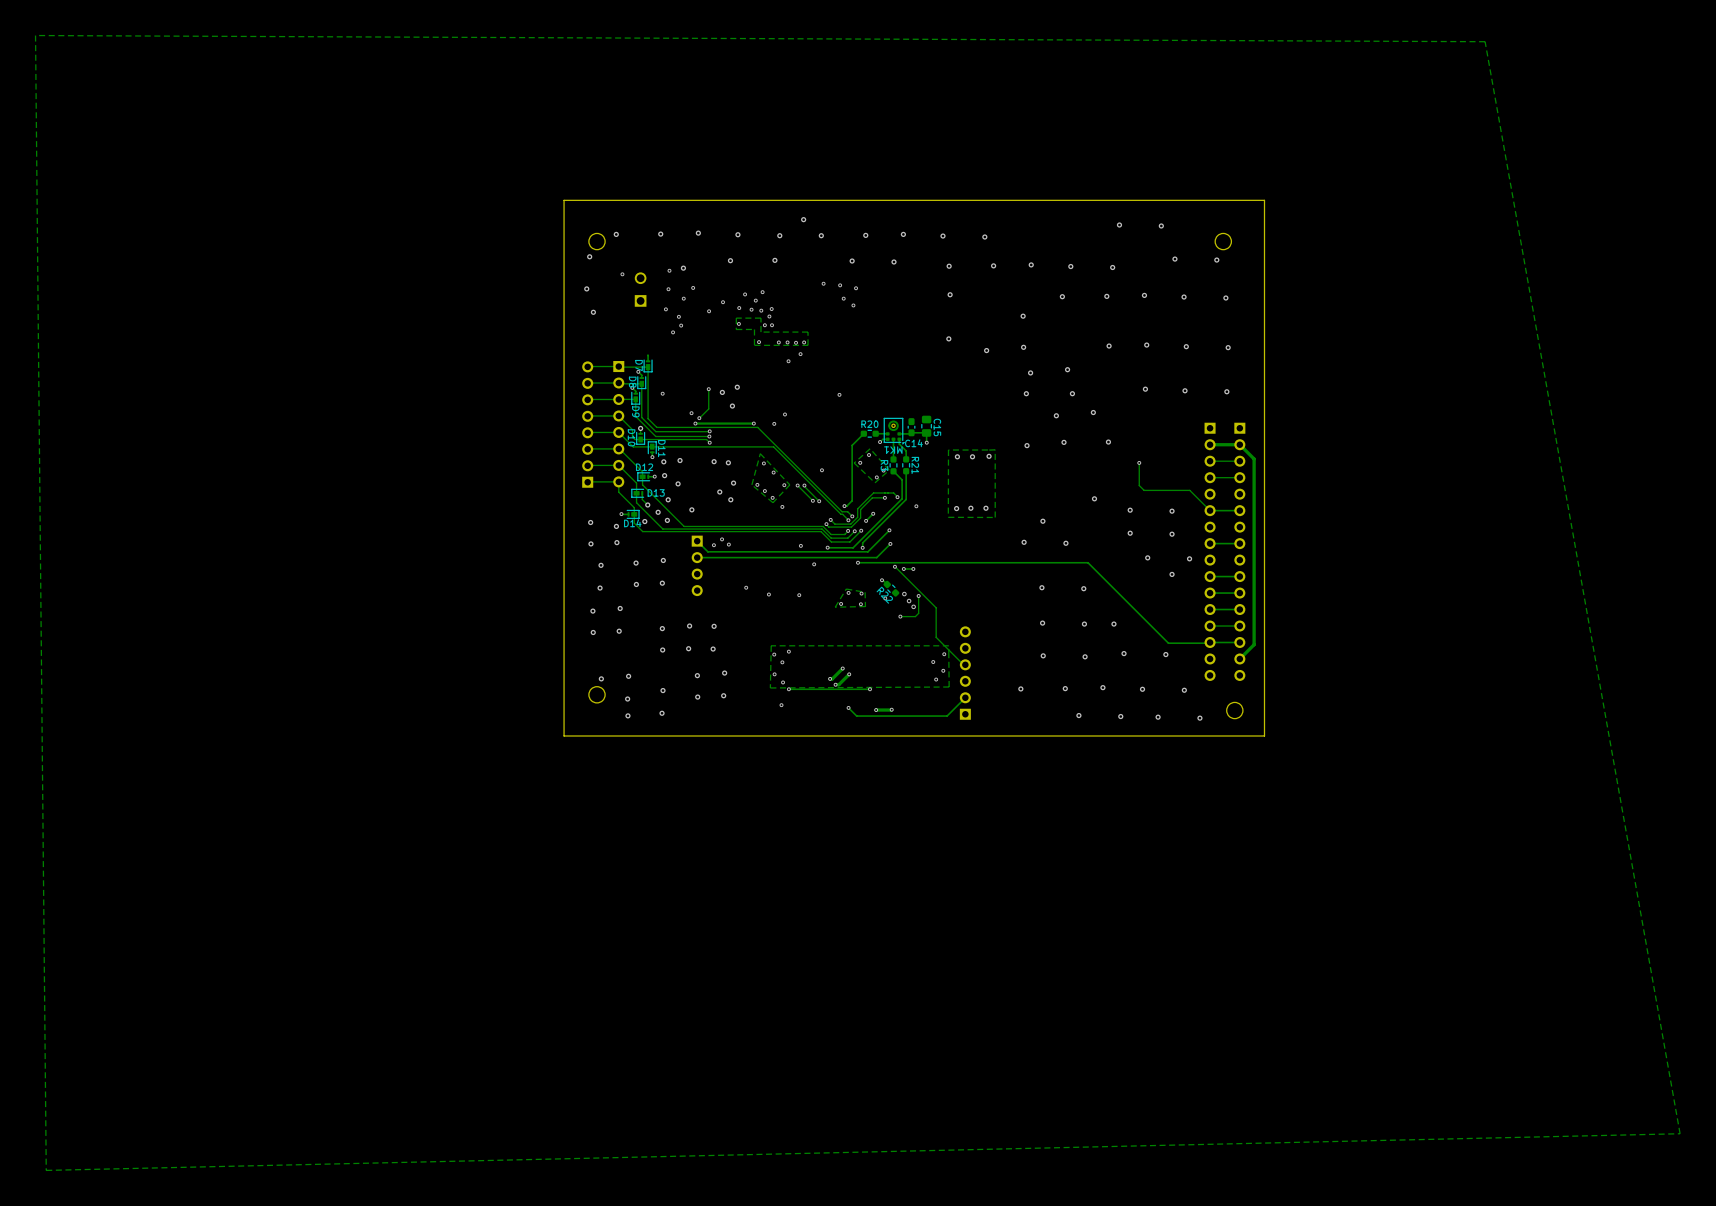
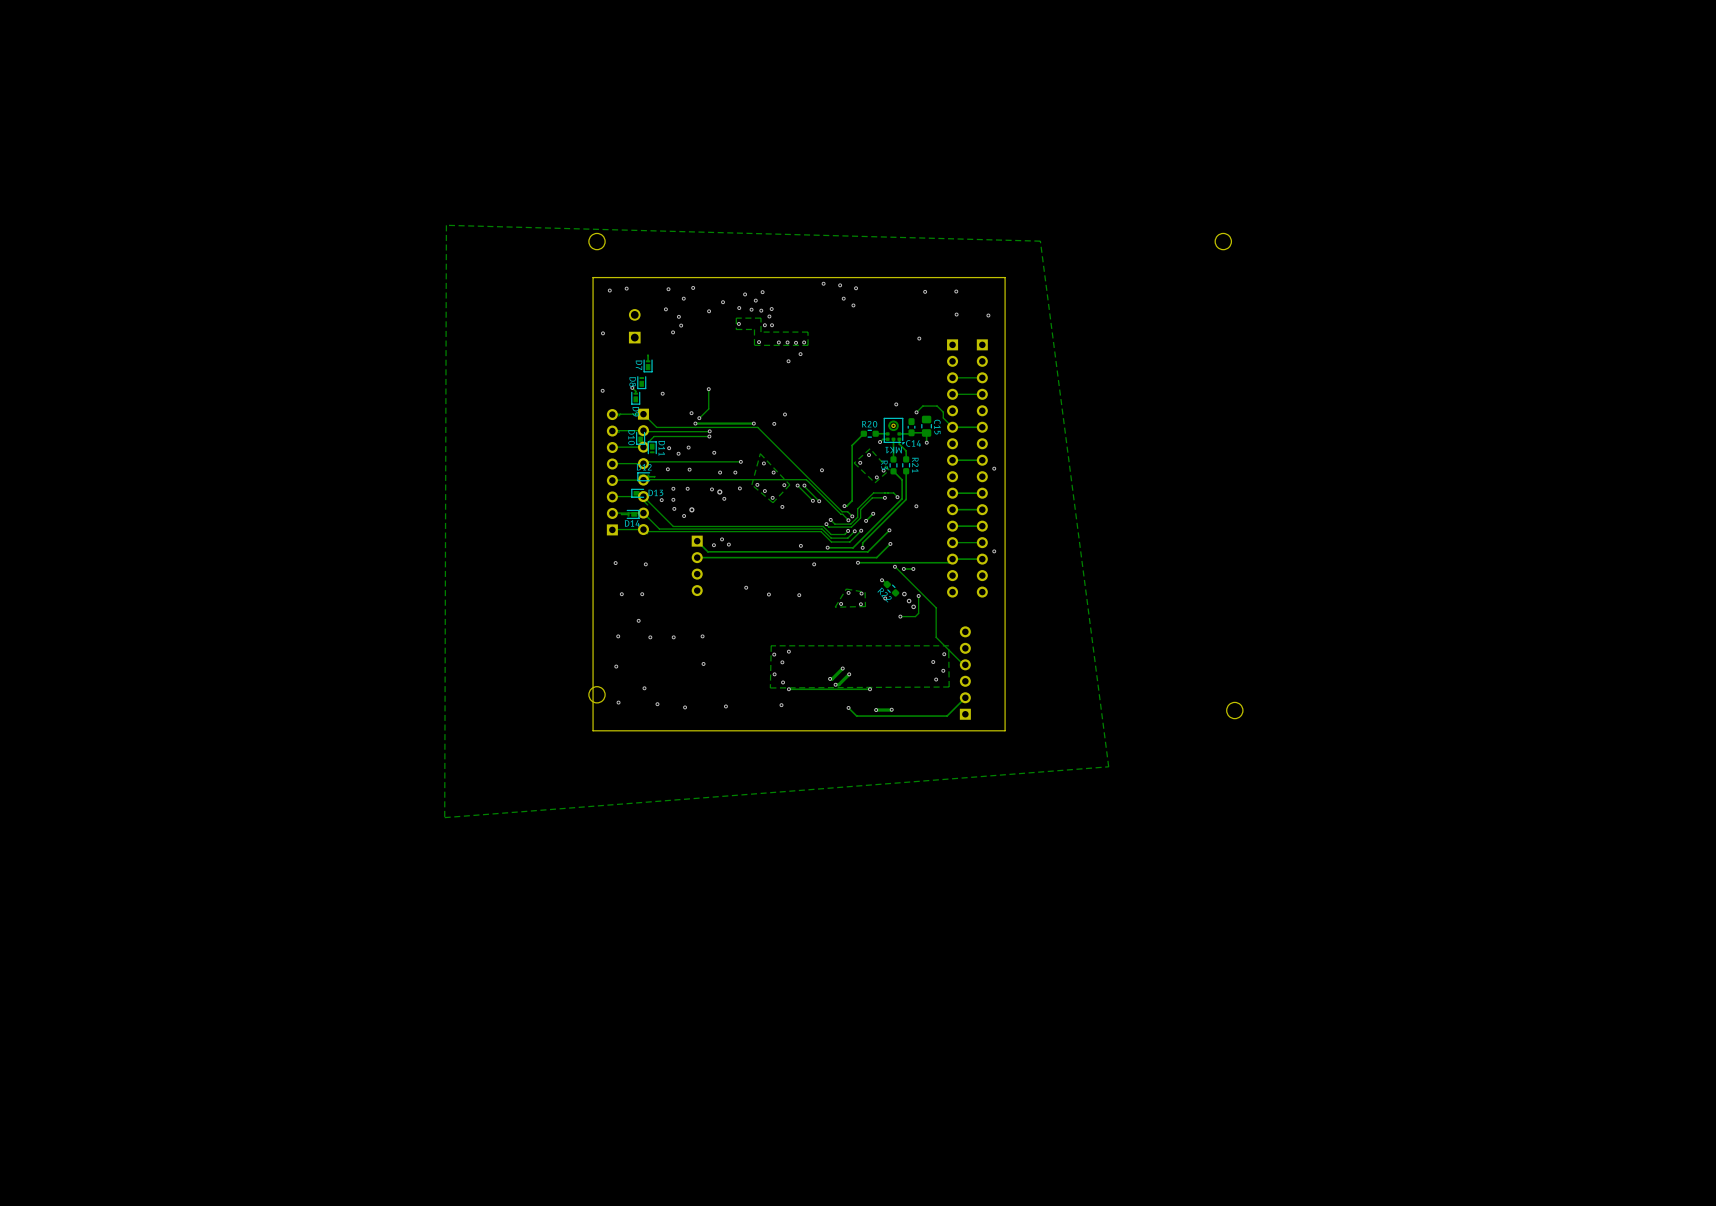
zone outline: (35, 35) (1485, 41) (1680, 1133) (46, 1170) (35, 35) -> none
board edge: (1264, 200) (564, 200) (564, 735) (1264, 735) (1264, 200) -> none
via: (803, 219) -> none
zone outline: none -> (446, 225) (1040, 241) (1108, 766) (444, 817) (446, 225)
via: (1119, 225) -> none
via: (1161, 225) -> none
via: (698, 233) -> none
via: (616, 234) -> none
via: (660, 234) -> none
via: (737, 234) -> none
via: (903, 234) -> none
via: (779, 235) -> none
via: (821, 235) -> none
via: (865, 235) -> none
via: (942, 236) -> none
via: (984, 237) -> none
via: (589, 256) -> none
via: (1174, 259) -> none
via: (730, 260) -> none
via: (774, 260) -> none
via: (1216, 260) -> none
via: (852, 261) -> none
via: (893, 261) -> none
via: (1031, 264) -> none
via: (993, 265) -> none
via: (949, 266) -> none
via: (1070, 266) -> none
via: (1112, 267) -> none
via: (683, 268) -> none
via: (669, 270) -> none
via: (622, 274) -> none
board edge: none -> (1005, 277) (593, 277) (593, 730) (1005, 730) (1005, 277)
via: (586, 288) -> none
via: none -> (626, 288)
part position: (640, 289) -> (634, 326)
via: none -> (609, 290)
via: none -> (925, 291)
via: none -> (956, 291)
via: (950, 294) -> none
via: (1144, 295) -> none
via: (1062, 296) -> none
via: (1106, 296) -> none
via: (1184, 297) -> none
via: (1225, 298) -> none
via: (593, 312) -> none
via: none -> (956, 314)
via: none -> (988, 315)
via: (1023, 316) -> none
via: none -> (602, 333)
via: none -> (919, 338)
via: (948, 338) -> none
via: (1146, 345) -> none
via: (1109, 346) -> none
via: (1186, 346) -> none
via: (1023, 347) -> none
via: (1228, 347) -> none
via: (986, 350) -> none
track: (587, 366) (648, 367) (648, 418) (656, 427) -> (612, 414) (643, 414) (656, 427)
via: (1067, 369) -> none
track: (638, 371) (641, 378) -> none
via: (638, 371) -> none
via: (1030, 372) -> none
track: none -> (982, 377) (952, 377)
track: (587, 383) (641, 383) (641, 417) (655, 431) -> (612, 431) (655, 431)
via: (737, 387) -> none
via: (1145, 389) -> none
via: none -> (602, 390)
via: (1185, 390) -> none
via: (1226, 391) -> none
via: (722, 392) -> none
track: none -> (953, 393) (982, 394)
via: (1026, 393) -> none
via: (1072, 393) -> none
via: (839, 394) -> none
track: (587, 399) (635, 399) (635, 416) (655, 436) -> (612, 447) (643, 447) (655, 436)
via: none -> (896, 404)
via: (732, 406) -> none
track: none -> (916, 412) (922, 406) (937, 406) (943, 412) (943, 418) (952, 427)
via: none -> (916, 412)
via: (1093, 412) -> none
via: (1056, 415) -> none
track: (587, 416) (618, 415) (632, 429) (632, 437) (634, 439) (706, 439) (709, 442) -> none
part: (587, 424) -> none
part: (618, 424) -> none
track: none -> (982, 427) (952, 427)
via: (640, 428) -> none
track: (587, 432) (618, 432) (633, 446) (773, 446) (806, 479) -> (612, 480) (806, 479)
via: (709, 442) -> none
via: (1063, 442) -> none
via: (1108, 442) -> none
track: (1210, 444) (1239, 444) (1254, 458) (1254, 644) (1239, 658) -> none
via: (1027, 445) -> none
via: none -> (688, 447)
via: none -> (669, 448)
track: (587, 449) (619, 448) (642, 471) (642, 484) (684, 526) -> (612, 496) (643, 496) (673, 526) (684, 526)
zone outline: (995, 449) (995, 517) (948, 517) (948, 450) (995, 449) -> none
track: (652, 452) (652, 457) -> none
via: none -> (714, 452)
via: none -> (678, 453)
via: (957, 456) -> none
via: (972, 456) -> none
via: (989, 456) -> none
via: (652, 457) -> none
via: (680, 460) -> none
track: none -> (982, 460) (952, 460)
via: (663, 461) -> none
via: (714, 461) -> none
track: none -> (740, 461) (645, 461) (643, 463) (612, 463)
via: none -> (740, 461)
track: (1239, 461) (1210, 461) -> none
via: (728, 462) -> none
track: (1139, 462) (1139, 485) (1144, 490) (1189, 490) (1210, 510) -> none
via: (1139, 462) -> none
track: (587, 465) (618, 465) (636, 483) (636, 502) (662, 529) -> (612, 513) (643, 513) (659, 529) (662, 529)
part: none -> (952, 468)
part: none -> (982, 468)
via: none -> (994, 468)
via: none -> (667, 469)
via: none -> (689, 469)
part: none -> (643, 471)
part: none -> (612, 472)
via: none -> (720, 472)
via: none -> (735, 472)
via: (664, 475) -> none
via: (654, 476) -> none
track: (1210, 476) (1239, 477) -> none
track: (587, 482) (618, 481) (618, 492) (634, 507) (634, 523) (642, 531) (645, 531) -> none
via: (678, 483) -> none
via: (733, 483) -> none
via: none -> (673, 488)
via: none -> (687, 488)
via: none -> (739, 488)
via: none -> (711, 489)
track: none -> (982, 493) (952, 493)
via: none -> (724, 498)
via: (1094, 498) -> none
via: (668, 499) -> none
via: none -> (673, 499)
via: (730, 499) -> none
via: none -> (661, 500)
via: (647, 504) -> none
via: none -> (674, 508)
via: (956, 508) -> none
via: (970, 508) -> none
via: (985, 508) -> none
track: none -> (982, 509) (952, 509)
via: (1130, 510) -> none
track: (1239, 510) (1210, 510) -> none
via: (1172, 511) -> none
via: (658, 512) -> none
via: (621, 514) -> none
via: none -> (684, 516)
via: (667, 520) -> none
via: (644, 521) -> none
via: (1042, 521) -> none
via: (590, 522) -> none
via: (616, 526) -> none
track: none -> (982, 526) (952, 526)
track: none -> (612, 529) (643, 529) (647, 533)
via: (1130, 533) -> none
via: (1172, 534) -> none
via: (616, 542) -> none
track: none -> (982, 542) (952, 542)
via: (1024, 542) -> none
via: (590, 543) -> none
via: (1065, 543) -> none
track: (1239, 543) (1210, 543) -> none
via: none -> (994, 551)
part: (1210, 551) -> none
part: (1239, 551) -> none
via: (1147, 557) -> none
via: (1189, 558) -> none
via: (663, 560) -> none
track: (948, 562) (1088, 562) (1168, 643) (1239, 642) -> (948, 562) (952, 559) (982, 559)
via: none -> (615, 563)
via: (636, 563) -> none
via: none -> (645, 564)
via: (601, 565) -> none
via: (1172, 574) -> none
track: (1239, 576) (1210, 576) -> none
via: (662, 583) -> none
via: (636, 584) -> none
via: (1041, 587) -> none
via: (600, 588) -> none
via: (1083, 588) -> none
track: (1239, 593) (1210, 593) -> none
via: none -> (621, 594)
via: none -> (642, 594)
via: (620, 608) -> none
track: (1239, 609) (1210, 609) -> none
via: (592, 611) -> none
via: none -> (638, 620)
via: (1042, 623) -> none
via: (1084, 624) -> none
via: (1113, 624) -> none
via: (689, 626) -> none
via: (714, 626) -> none
track: (1239, 626) (1210, 626) -> none
via: (662, 628) -> none
via: (619, 631) -> none
via: (593, 632) -> none
via: none -> (618, 636)
via: none -> (702, 636)
via: none -> (650, 637)
via: none -> (673, 637)
via: (688, 648) -> none
via: (713, 649) -> none
via: (662, 650) -> none
via: (1124, 653) -> none
via: (1165, 654) -> none
via: (1043, 655) -> none
via: (1085, 656) -> none
via: none -> (703, 663)
via: none -> (616, 666)
via: (724, 673) -> none
via: (697, 675) -> none
via: (628, 676) -> none
via: (601, 678) -> none
via: (1102, 687) -> none
via: none -> (644, 688)
via: (1020, 688) -> none
via: (1065, 688) -> none
via: (1142, 689) -> none
via: (662, 690) -> none
via: (1184, 690) -> none
via: (723, 695) -> none
via: (697, 697) -> none
via: (627, 699) -> none
via: none -> (618, 702)
via: none -> (657, 704)
via: none -> (725, 706)
via: none -> (685, 707)
via: (662, 713) -> none
via: (627, 715) -> none
via: (1078, 715) -> none
via: (1120, 716) -> none
via: (1158, 717) -> none
via: (1199, 718) -> none

